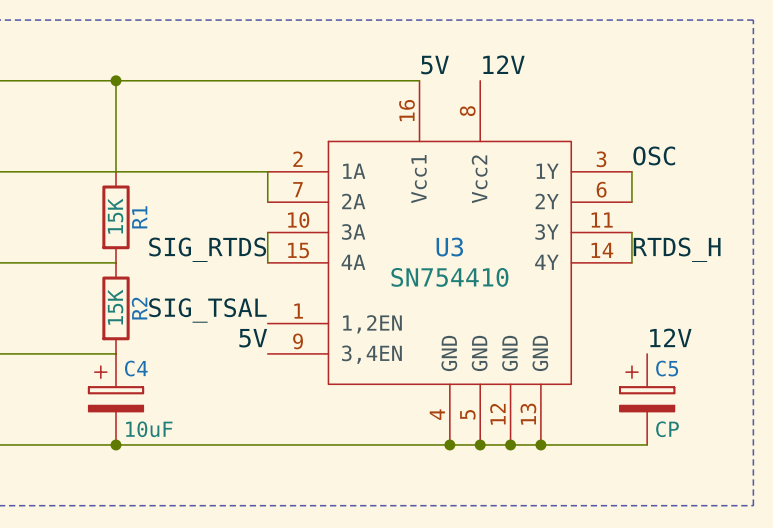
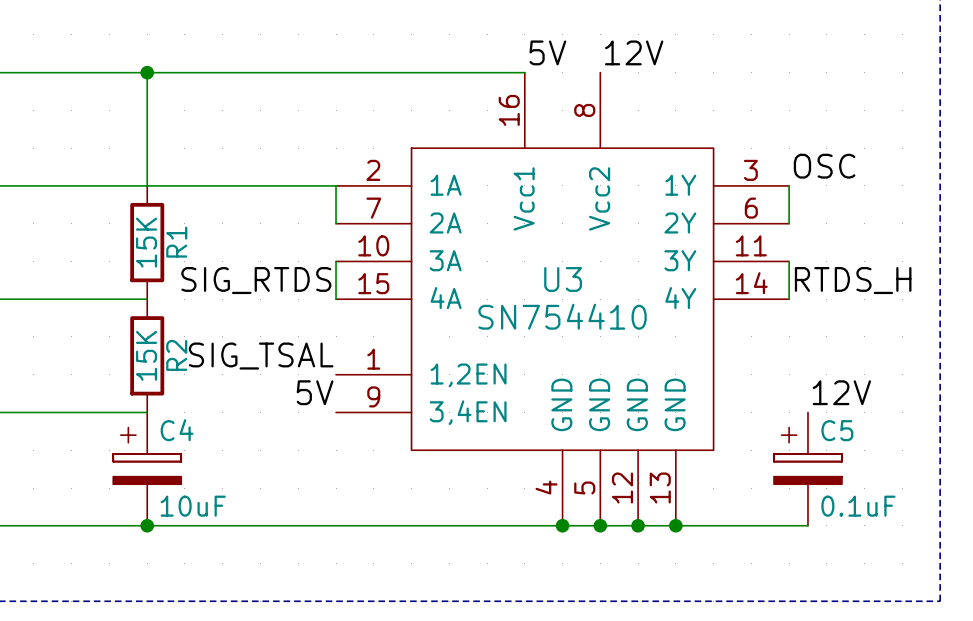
C5 value: CP (667, 429) -> 0.1uF (858, 506)

